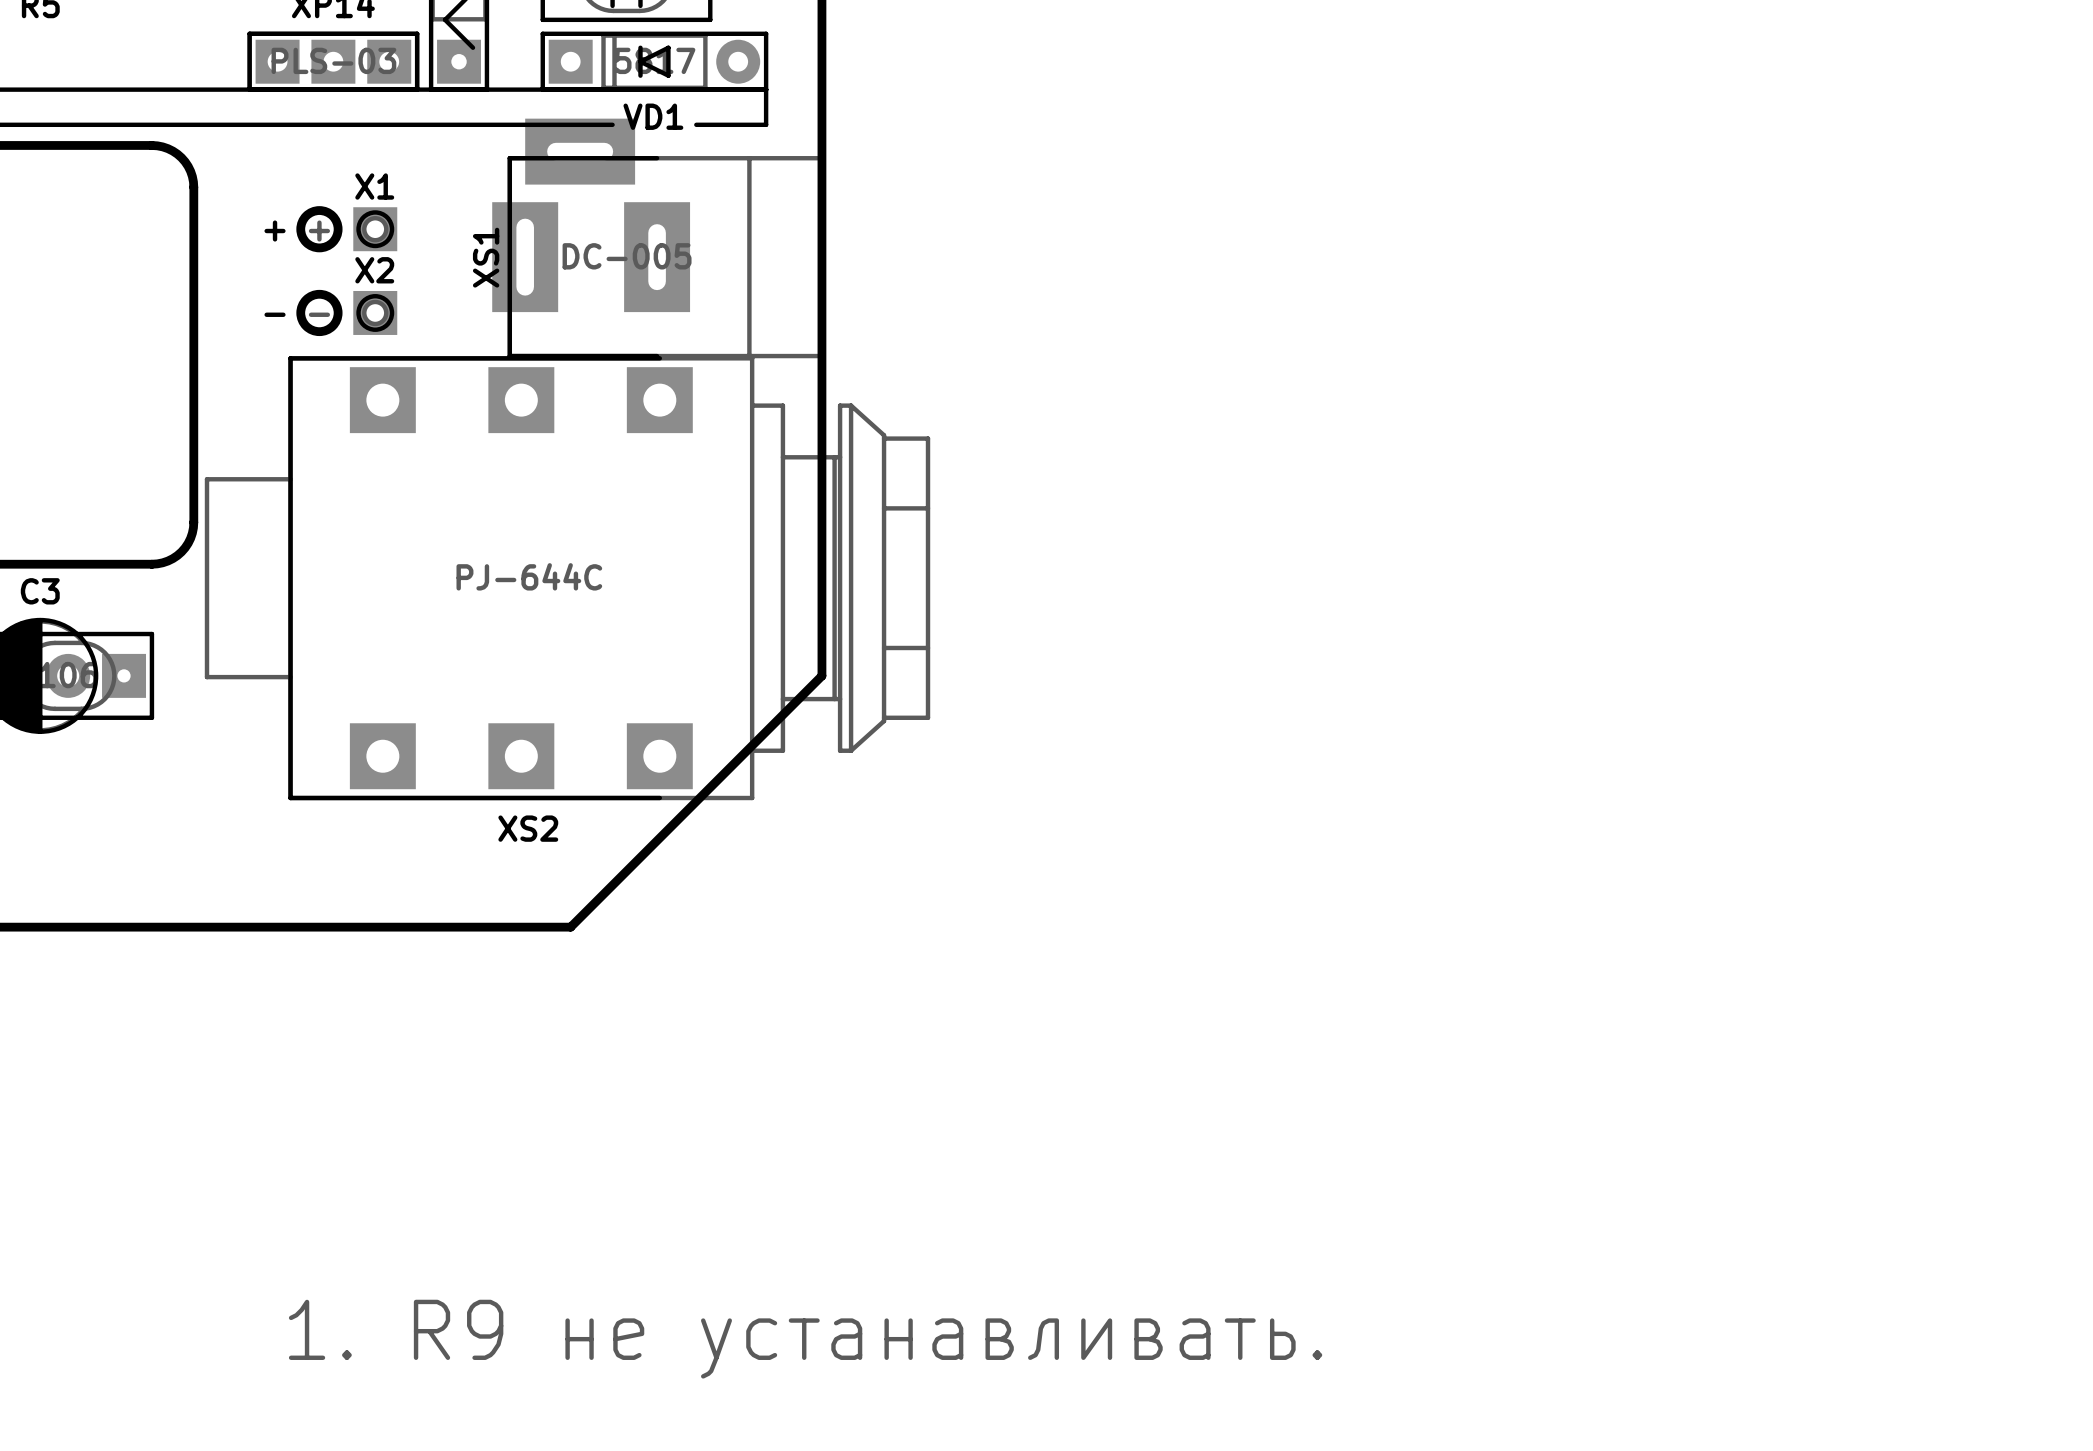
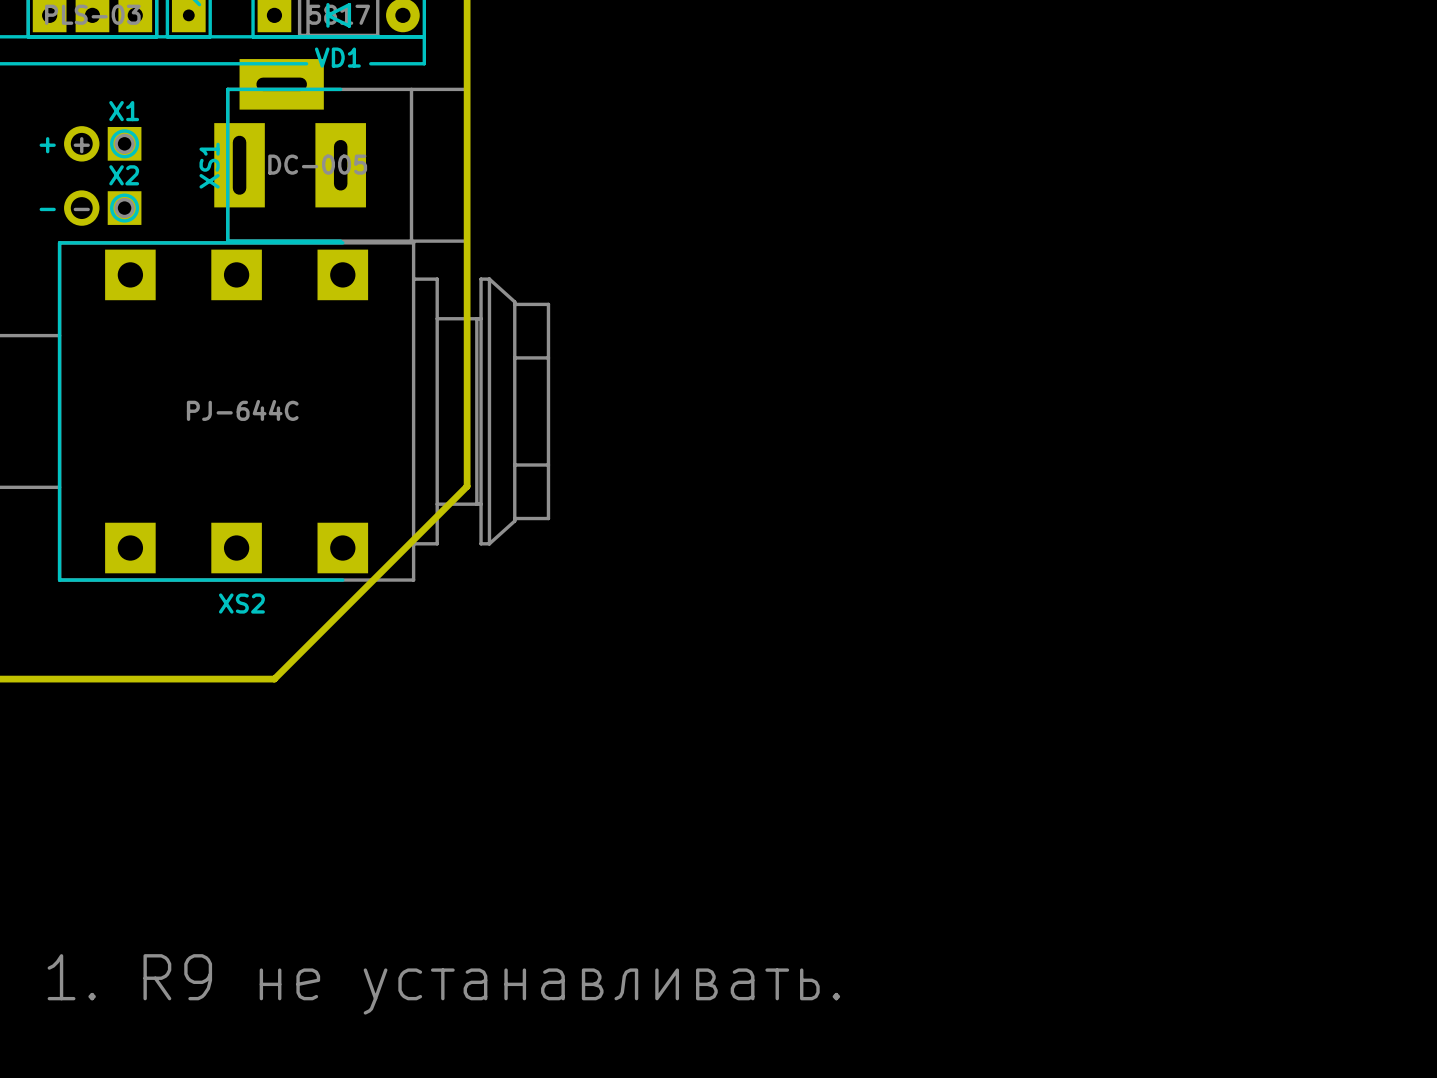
text position: 1. R9 не устанавливать. (805, 1339) -> 1. R9 не устанавливать. (443, 984)

